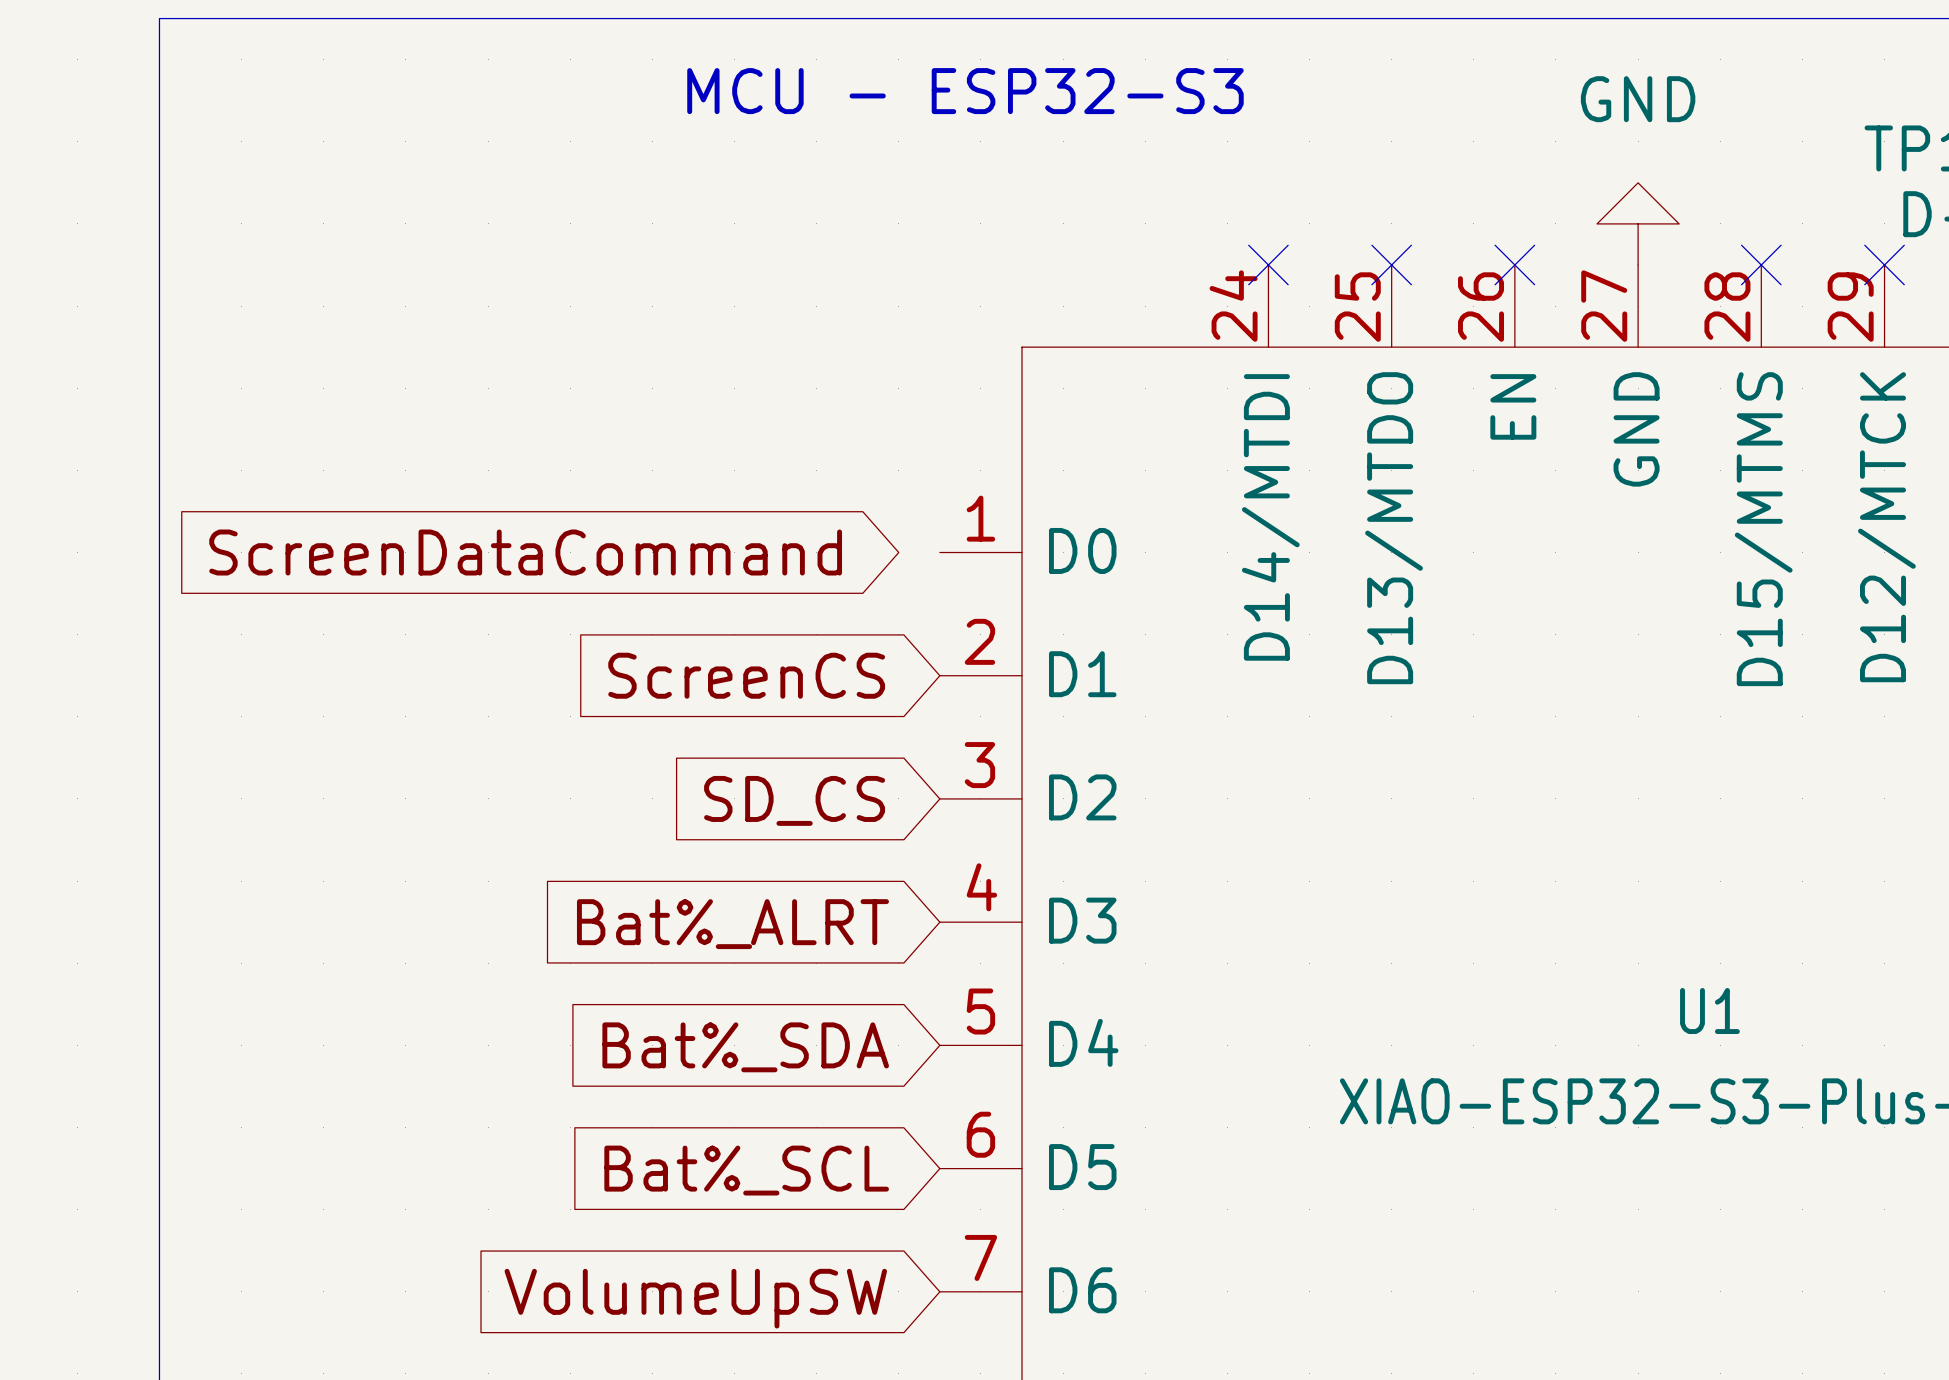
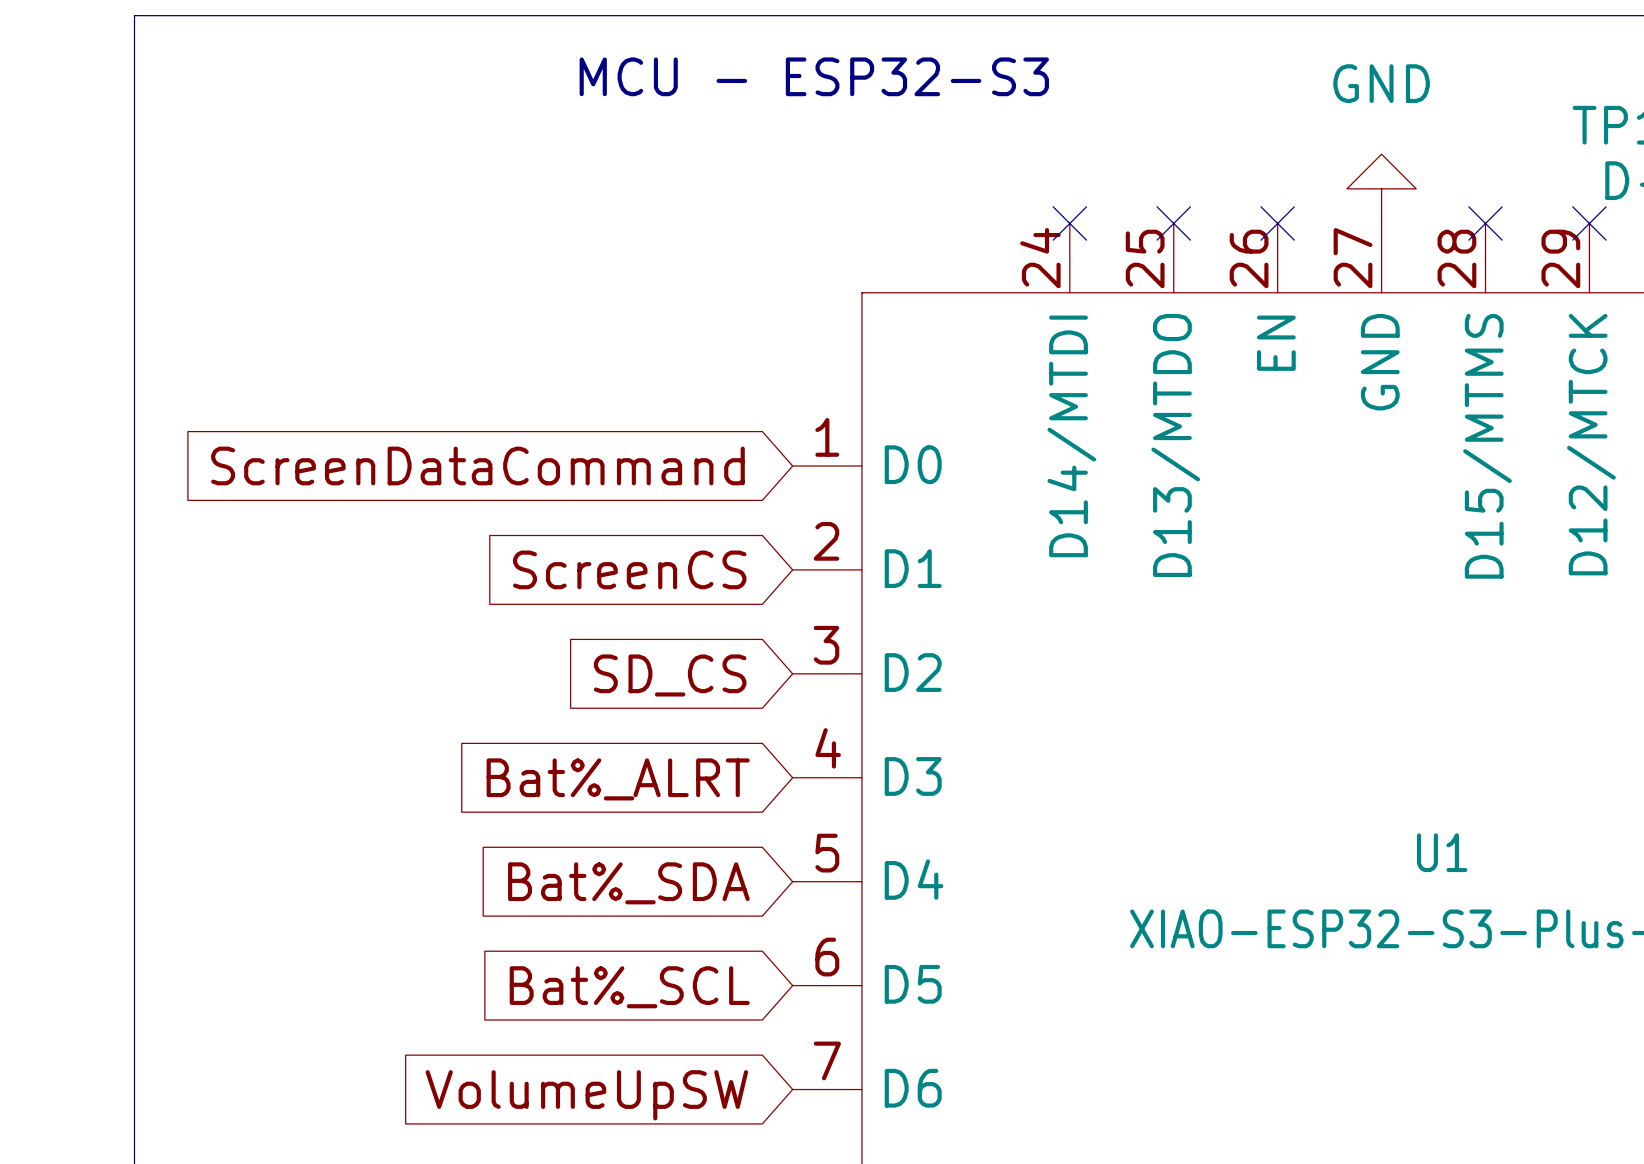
global label position: ScreenDataCommand (525, 552) -> ScreenDataCommand (477, 465)

